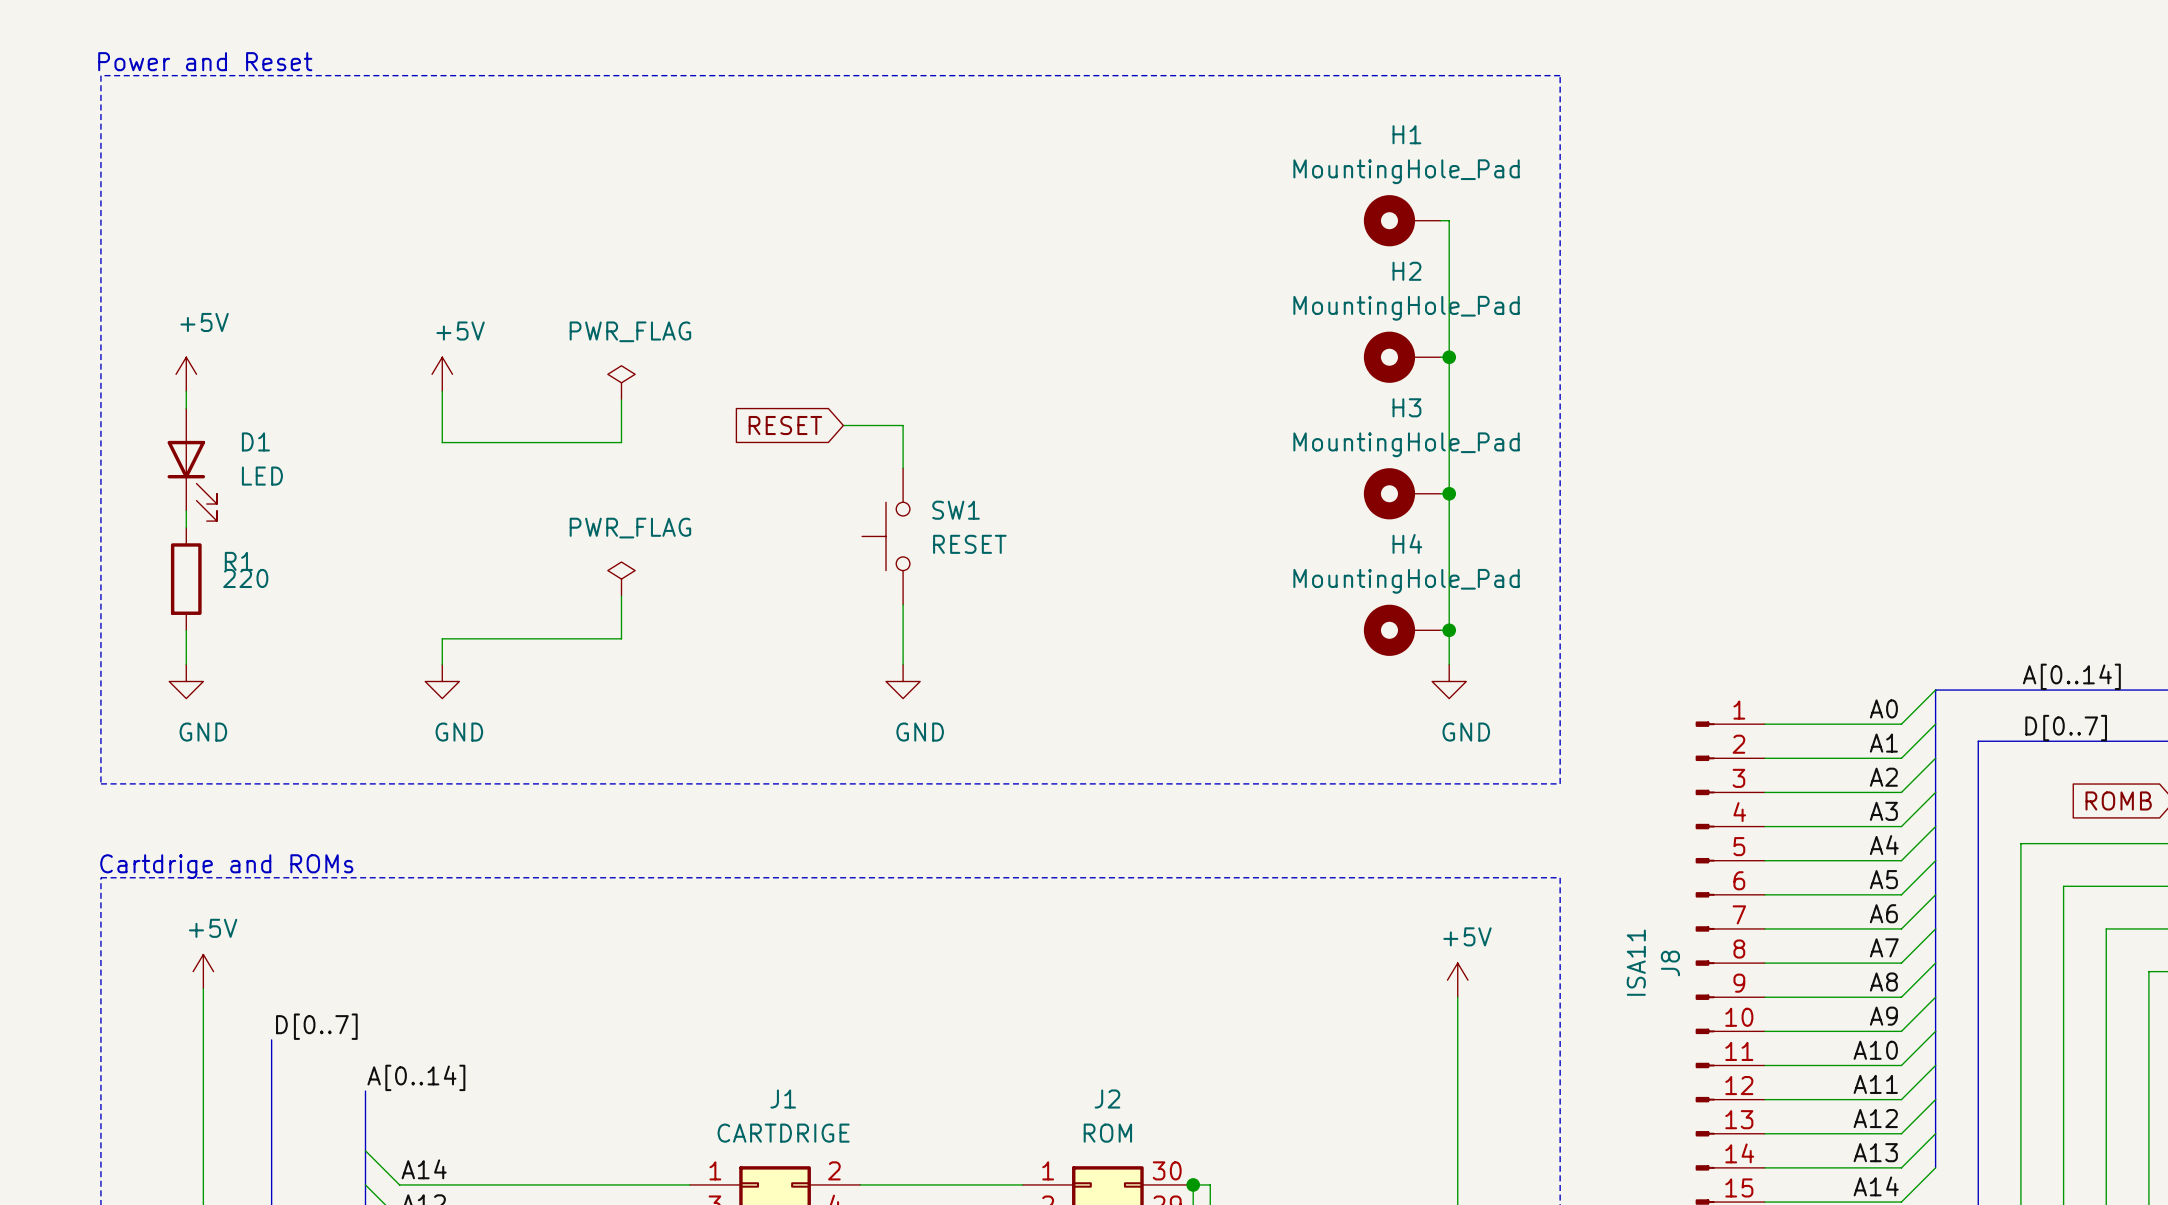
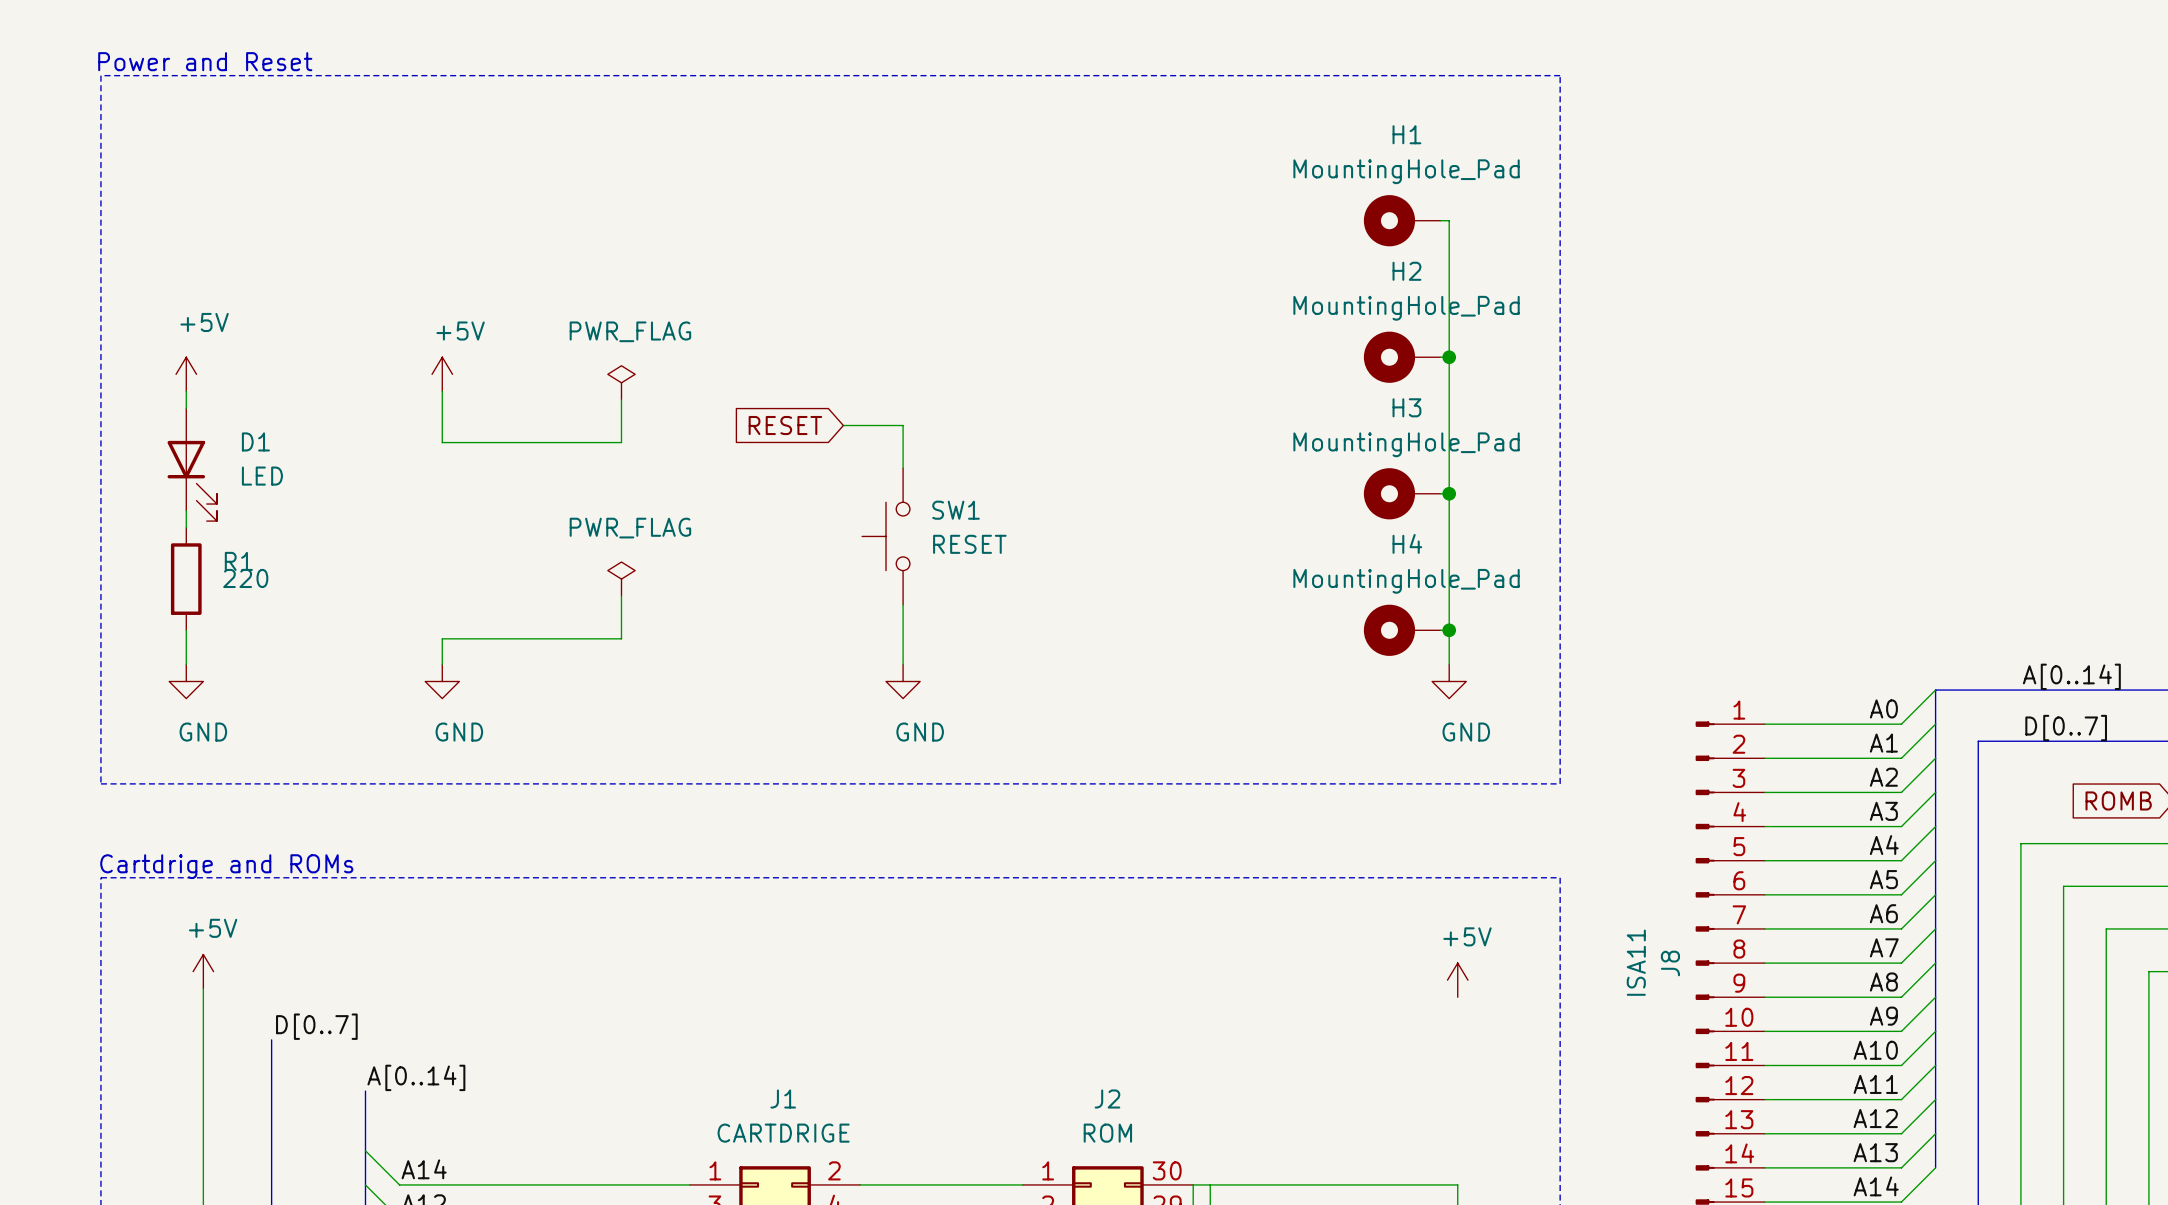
wire: (1457, 997) (1457, 1184) -> (1210, 1184) (1457, 1184)
junction: (1193, 1184) -> none

